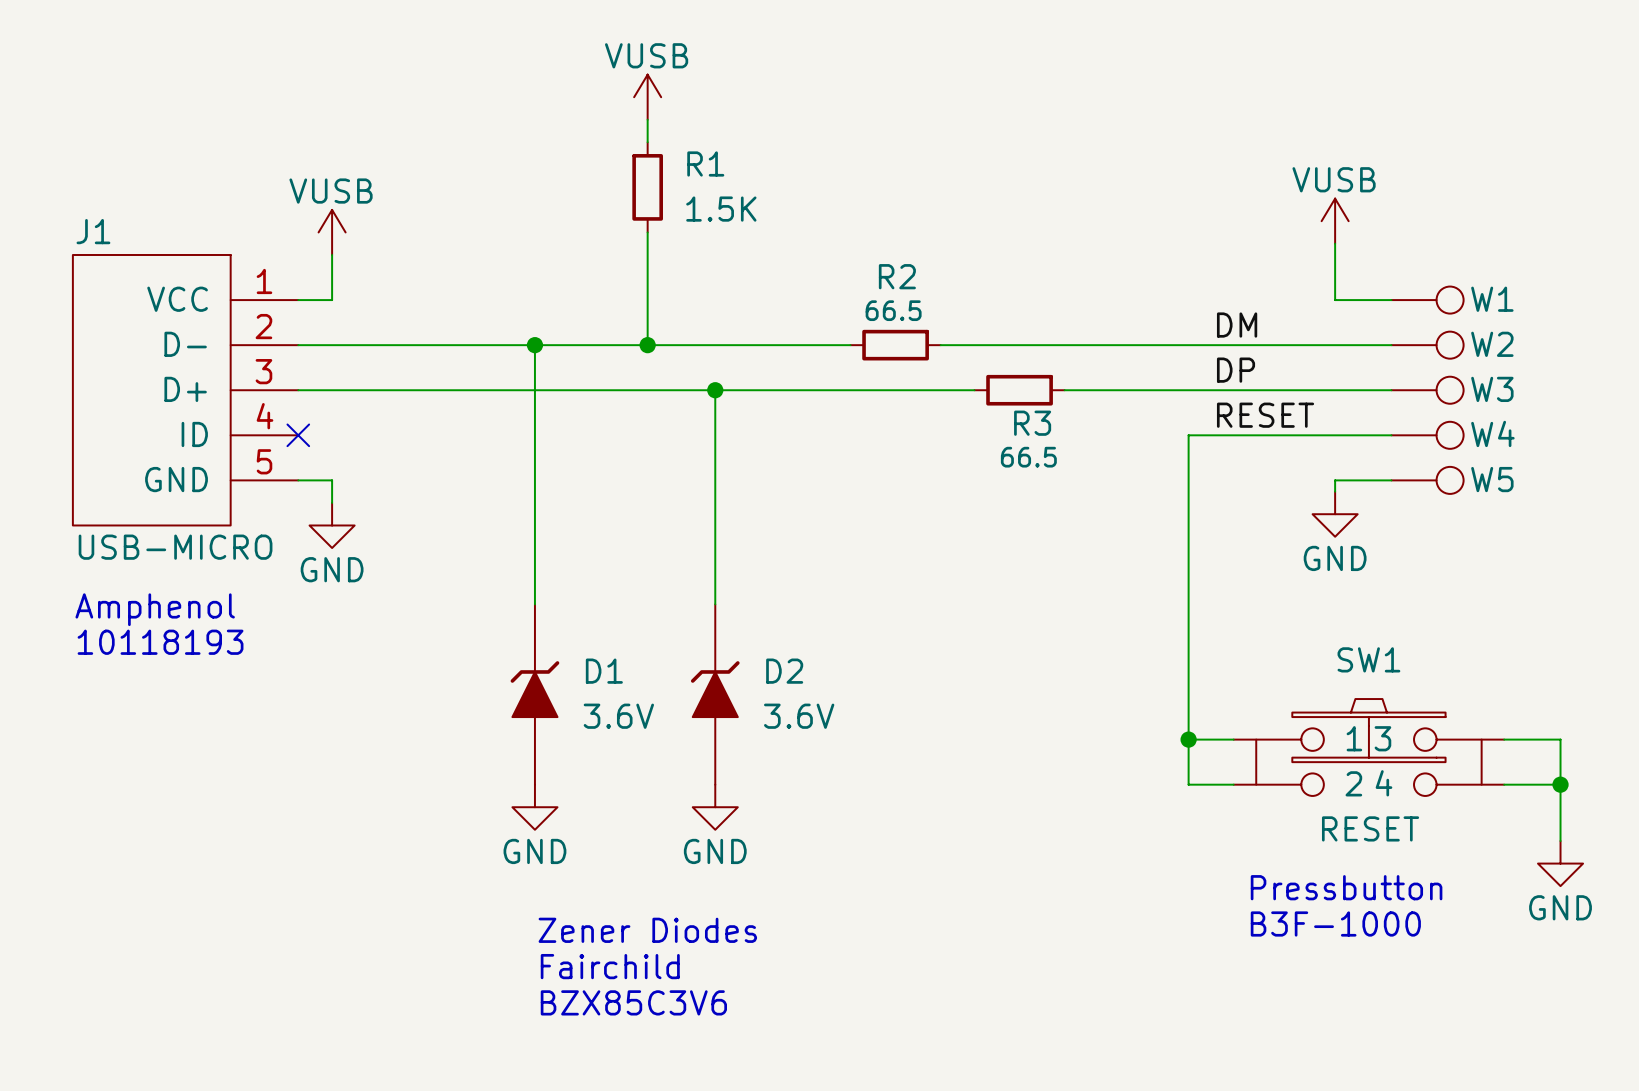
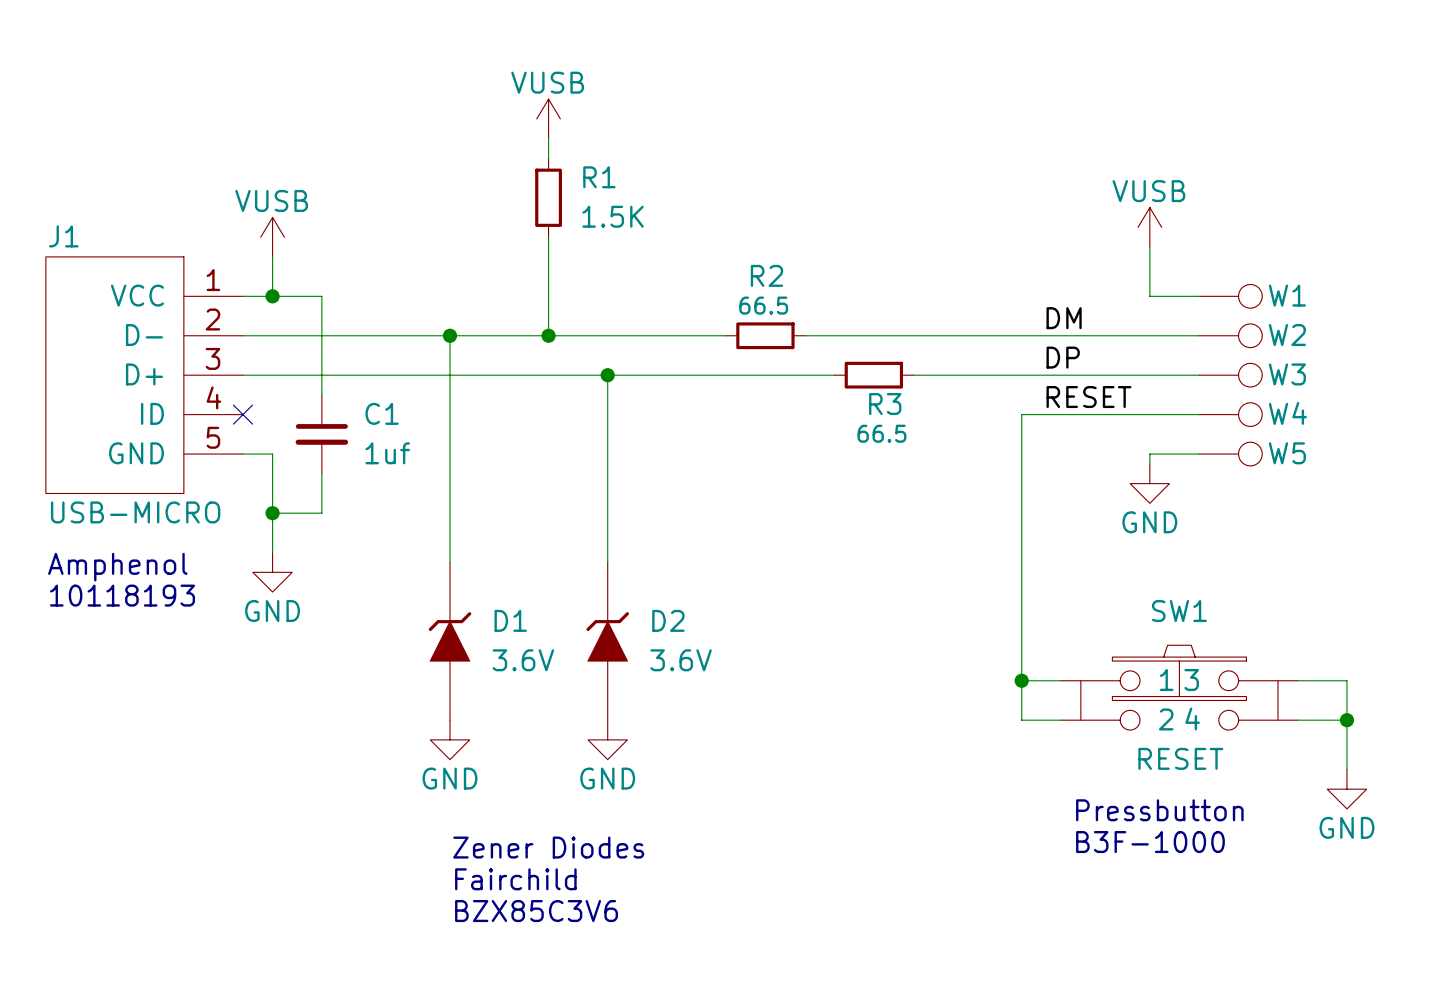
wire: none -> (272, 296) (321, 296) (321, 394)
junction: none -> (272, 296)
C1: none -> 1uf (321, 434)
wire: none -> (272, 473) (272, 552)
wire: none -> (321, 473) (321, 513) (272, 513)
power symbol position: GND (332, 525) -> GND (272, 572)
junction: none -> (272, 513)

